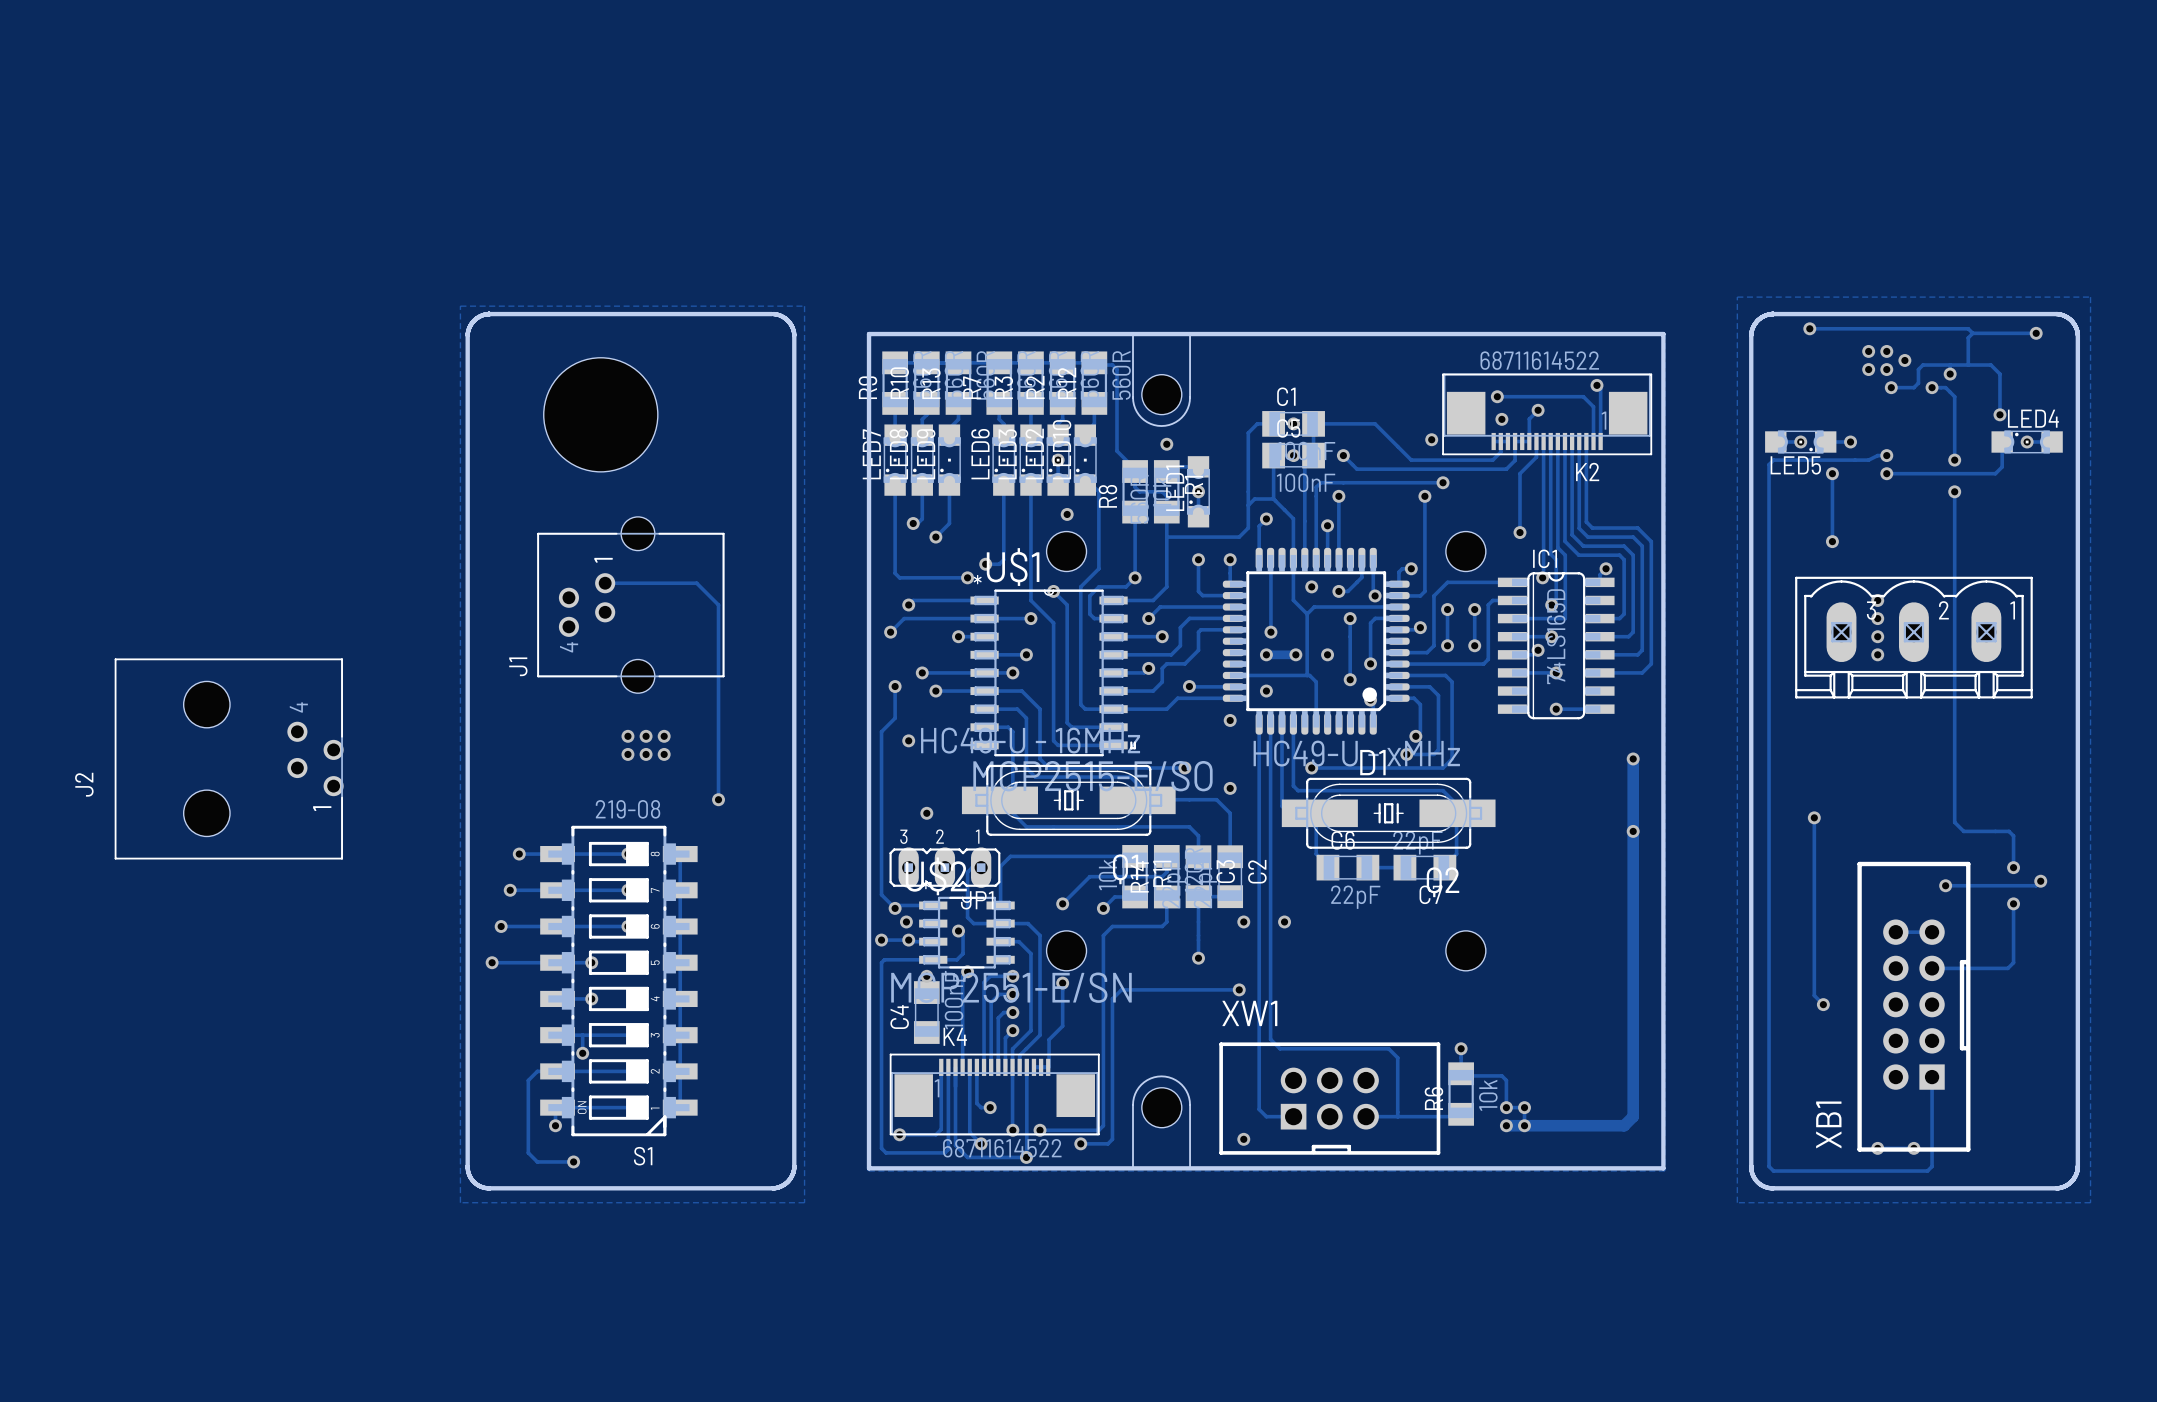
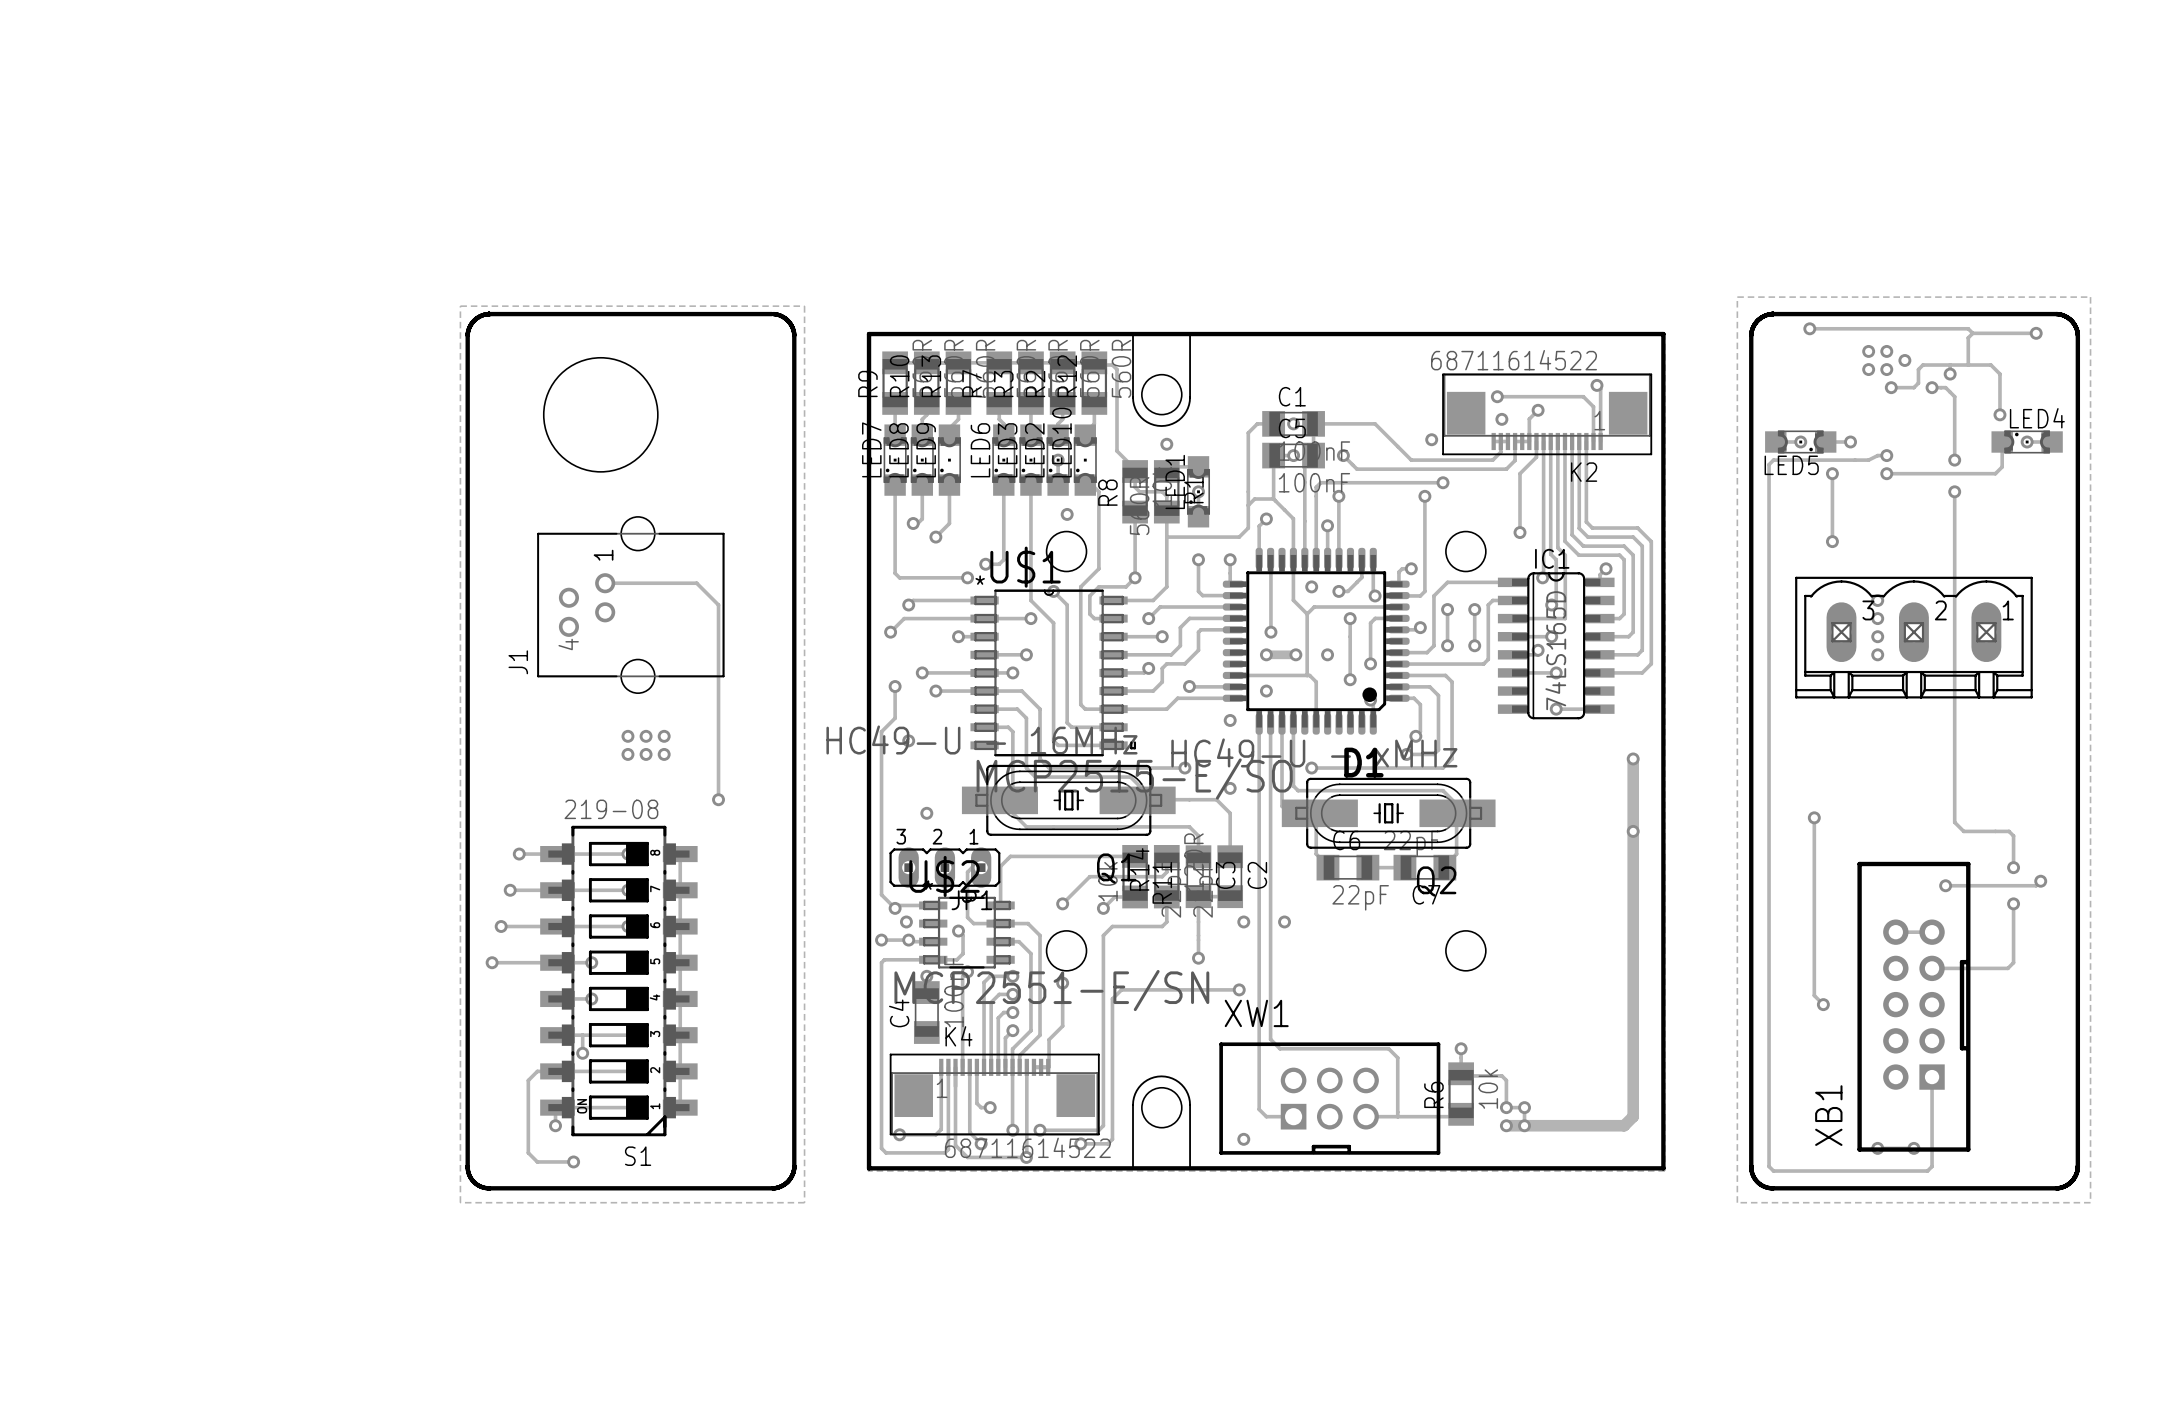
J2: (229, 758) -> none

